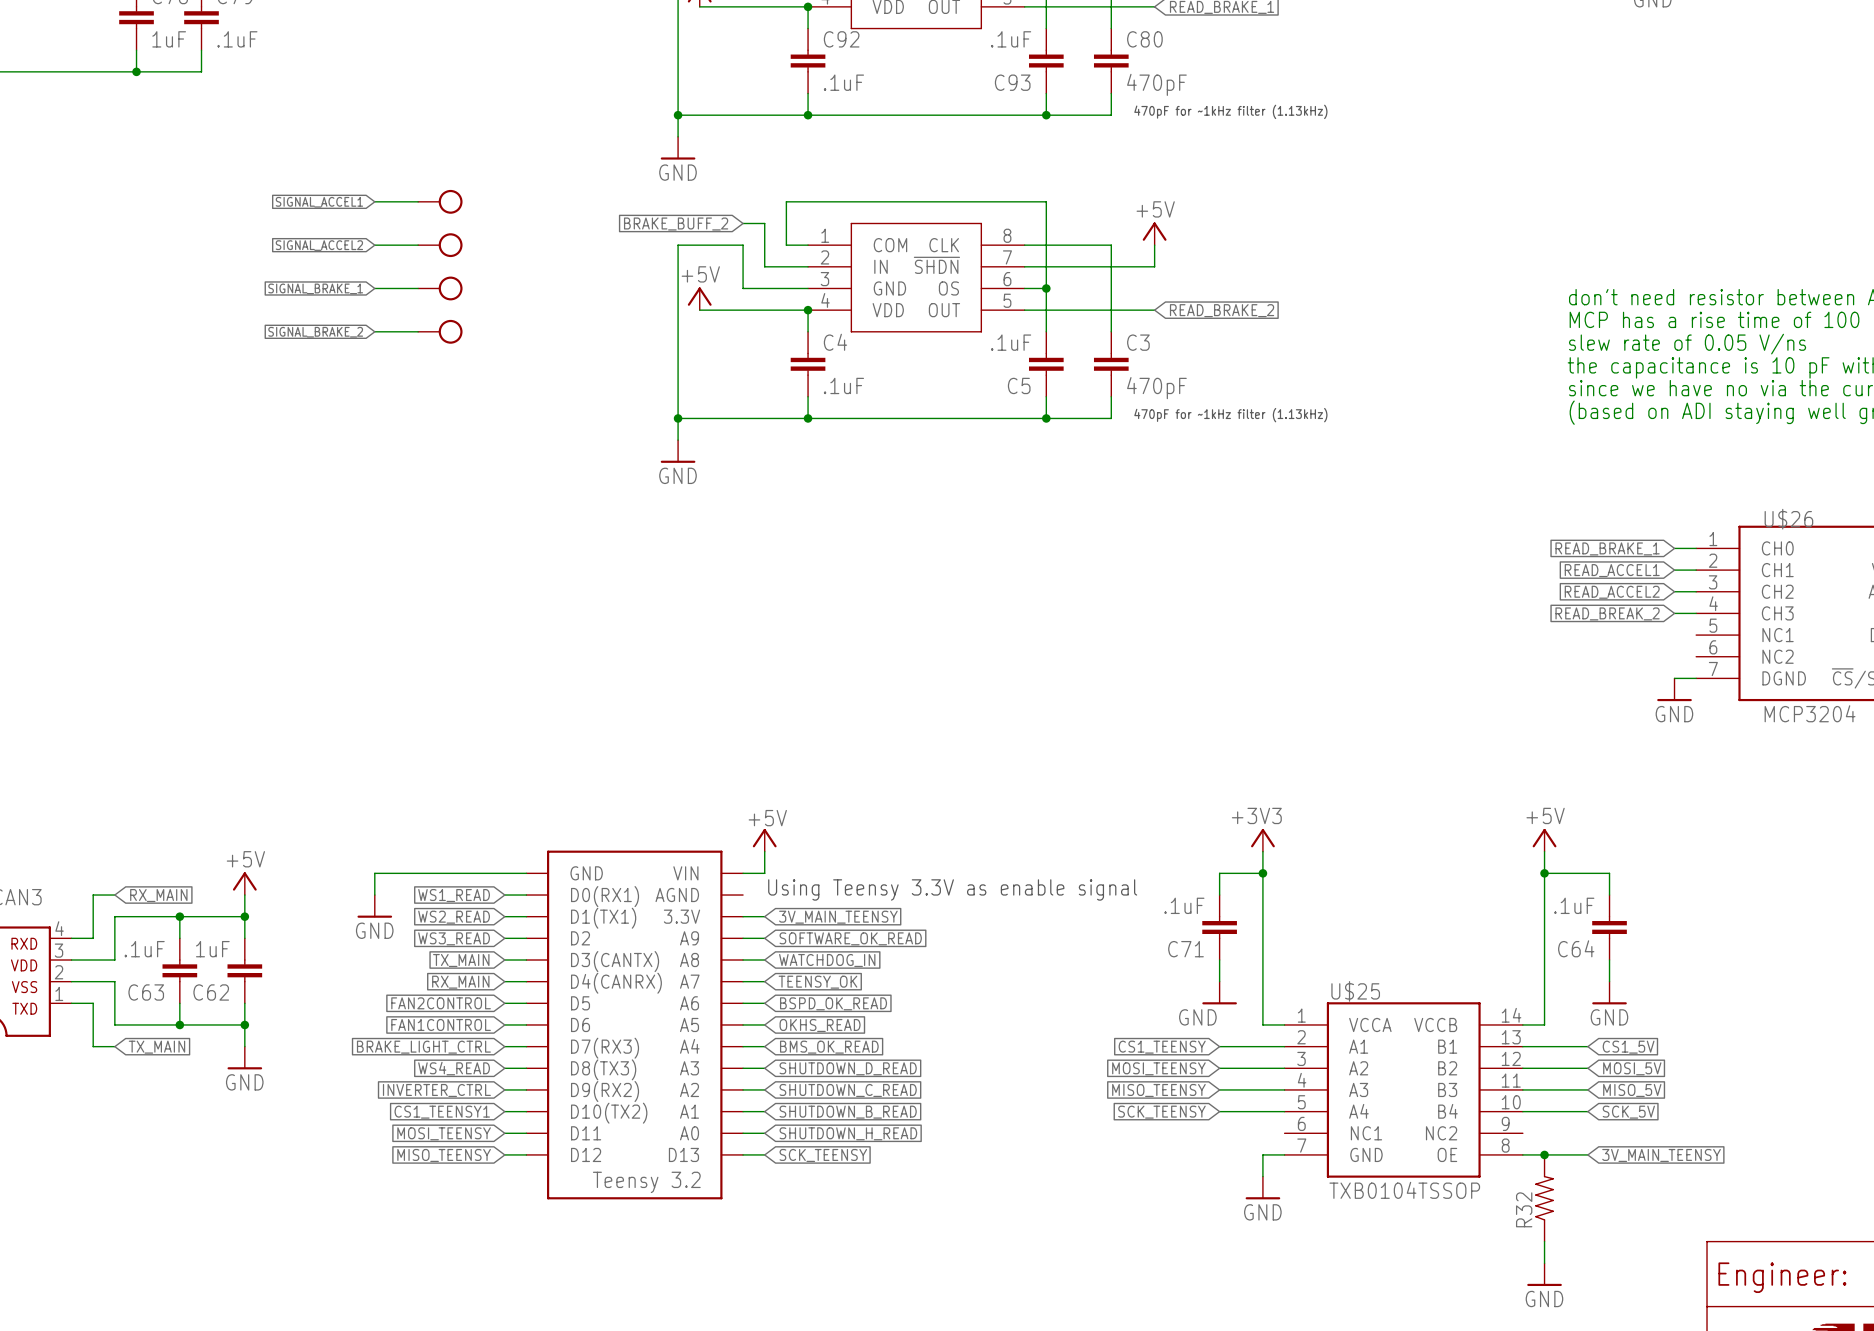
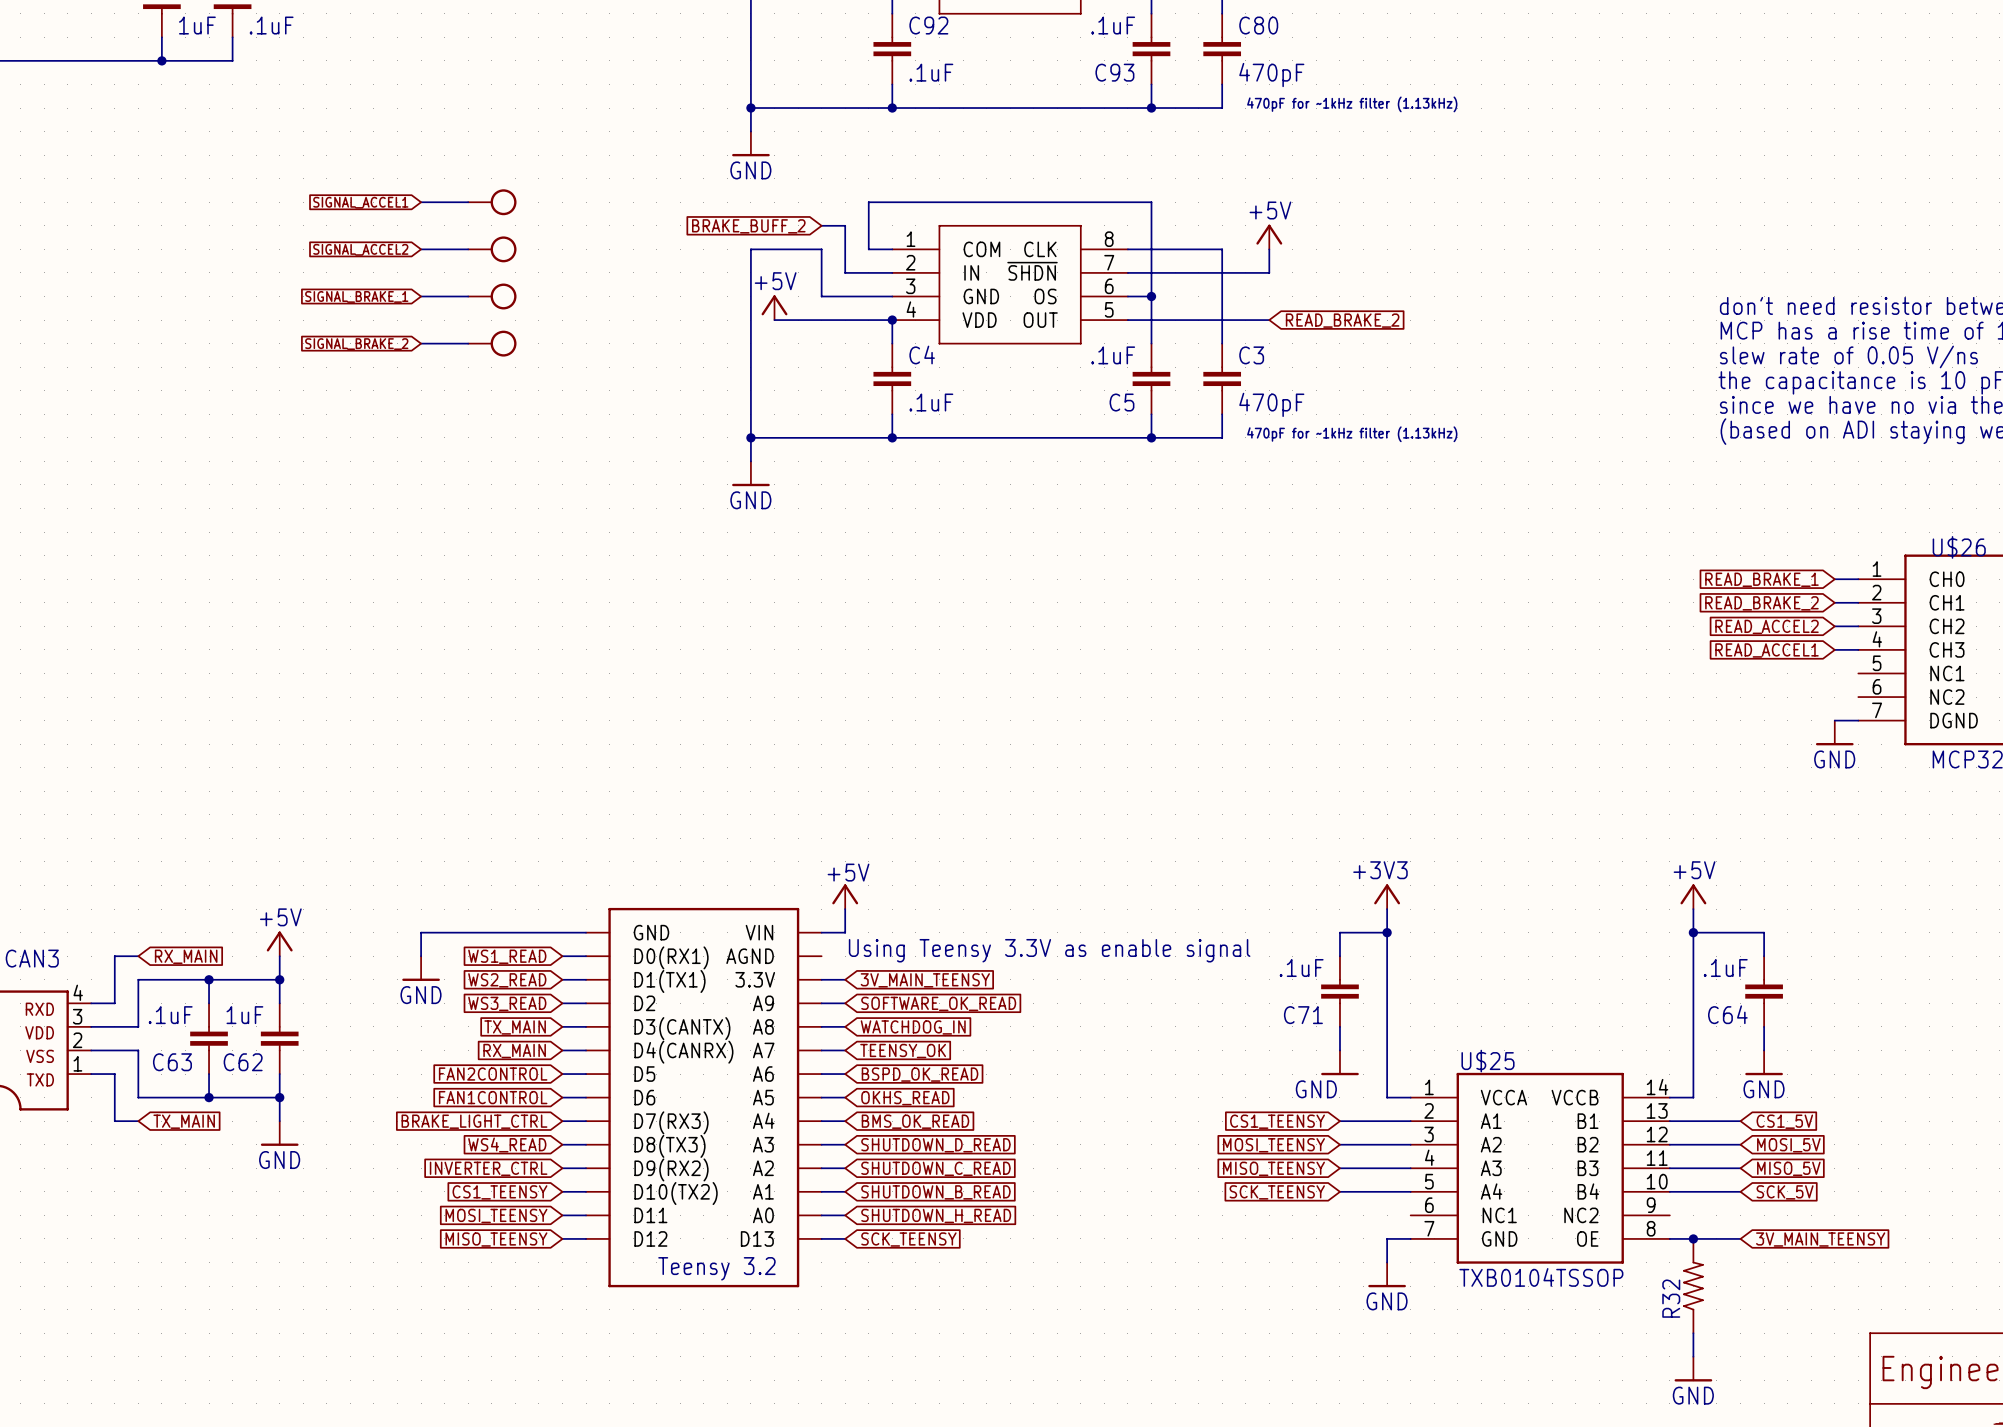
global label: READ_ACCEL1 (1612, 570) -> READ_BRAKE_2 (1761, 603)
global label: READ_BREAK_2 (1607, 613) -> READ_ACCEL1 (1767, 650)
global label: CS1_TEENSY1 (442, 1112) -> CS1_TEENSY (499, 1192)

